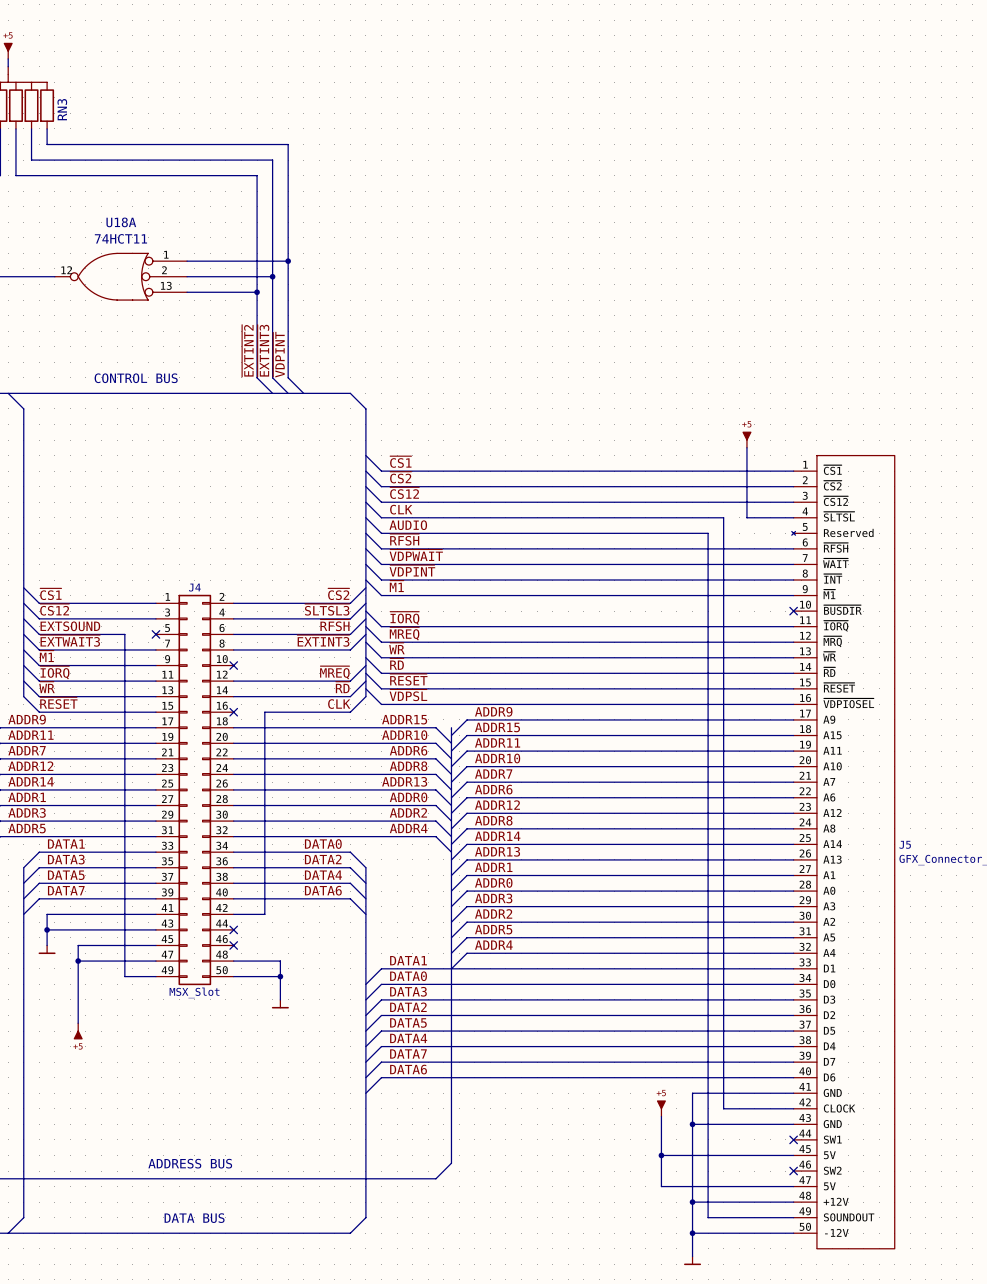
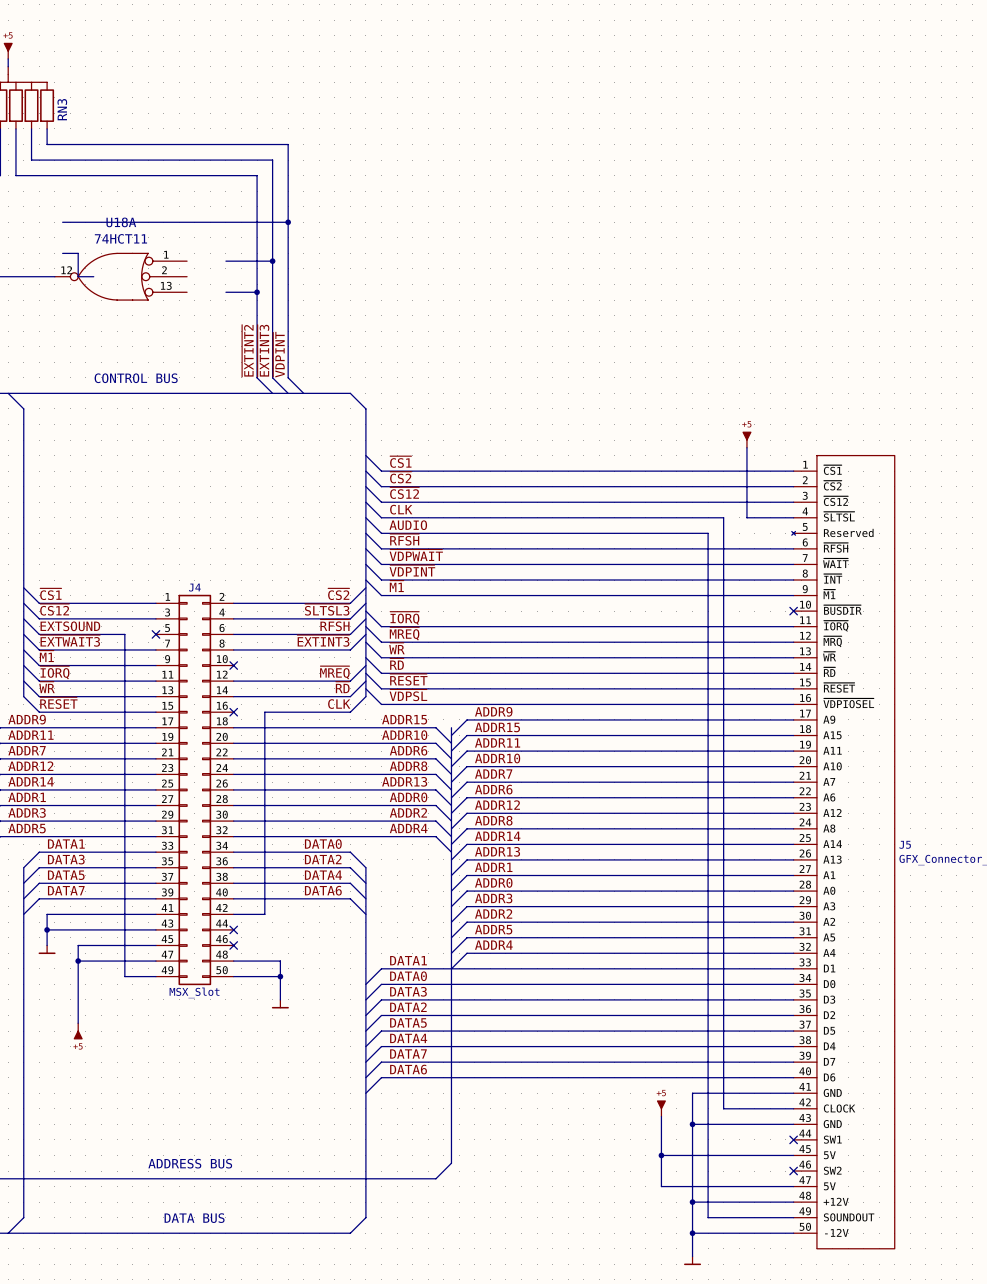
wire: none -> (62, 222) (288, 222)
junction: none -> (288, 222)
wire: none -> (62, 253) (78, 253) (78, 276) (93, 276)
wire: (187, 261) (225, 261) -> none
wire: (272, 261) (288, 261) -> none
junction: none -> (272, 261)
junction: (288, 261) -> none
wire: (187, 276) (272, 276) -> none
junction: (272, 276) -> none
wire: (187, 292) (225, 292) -> none

